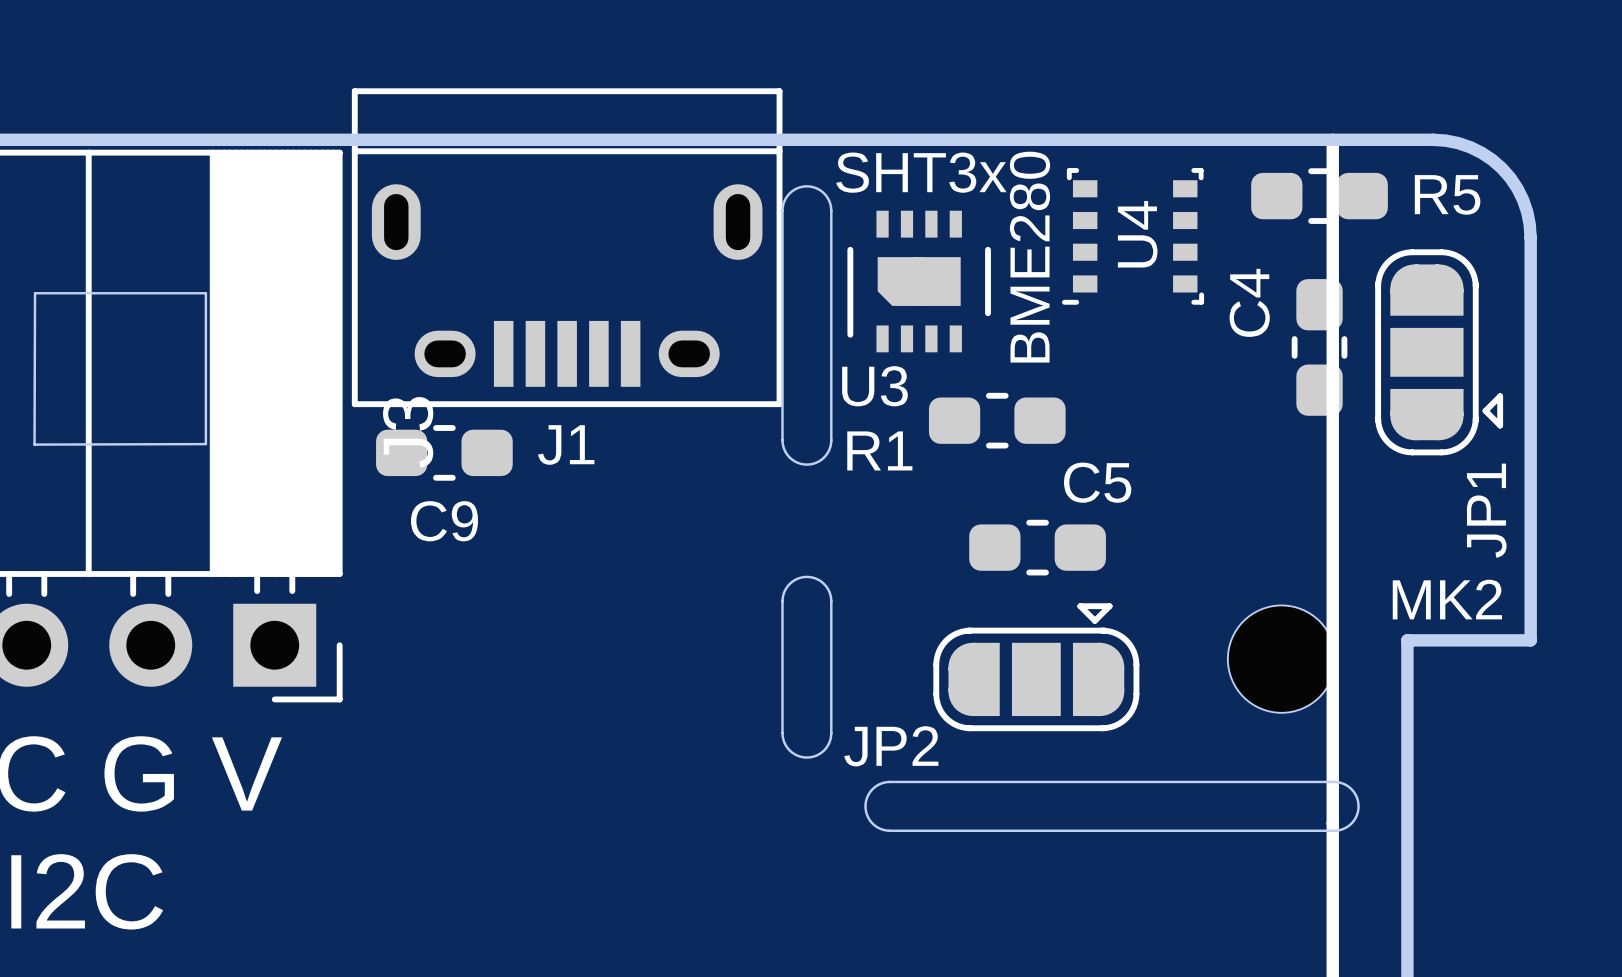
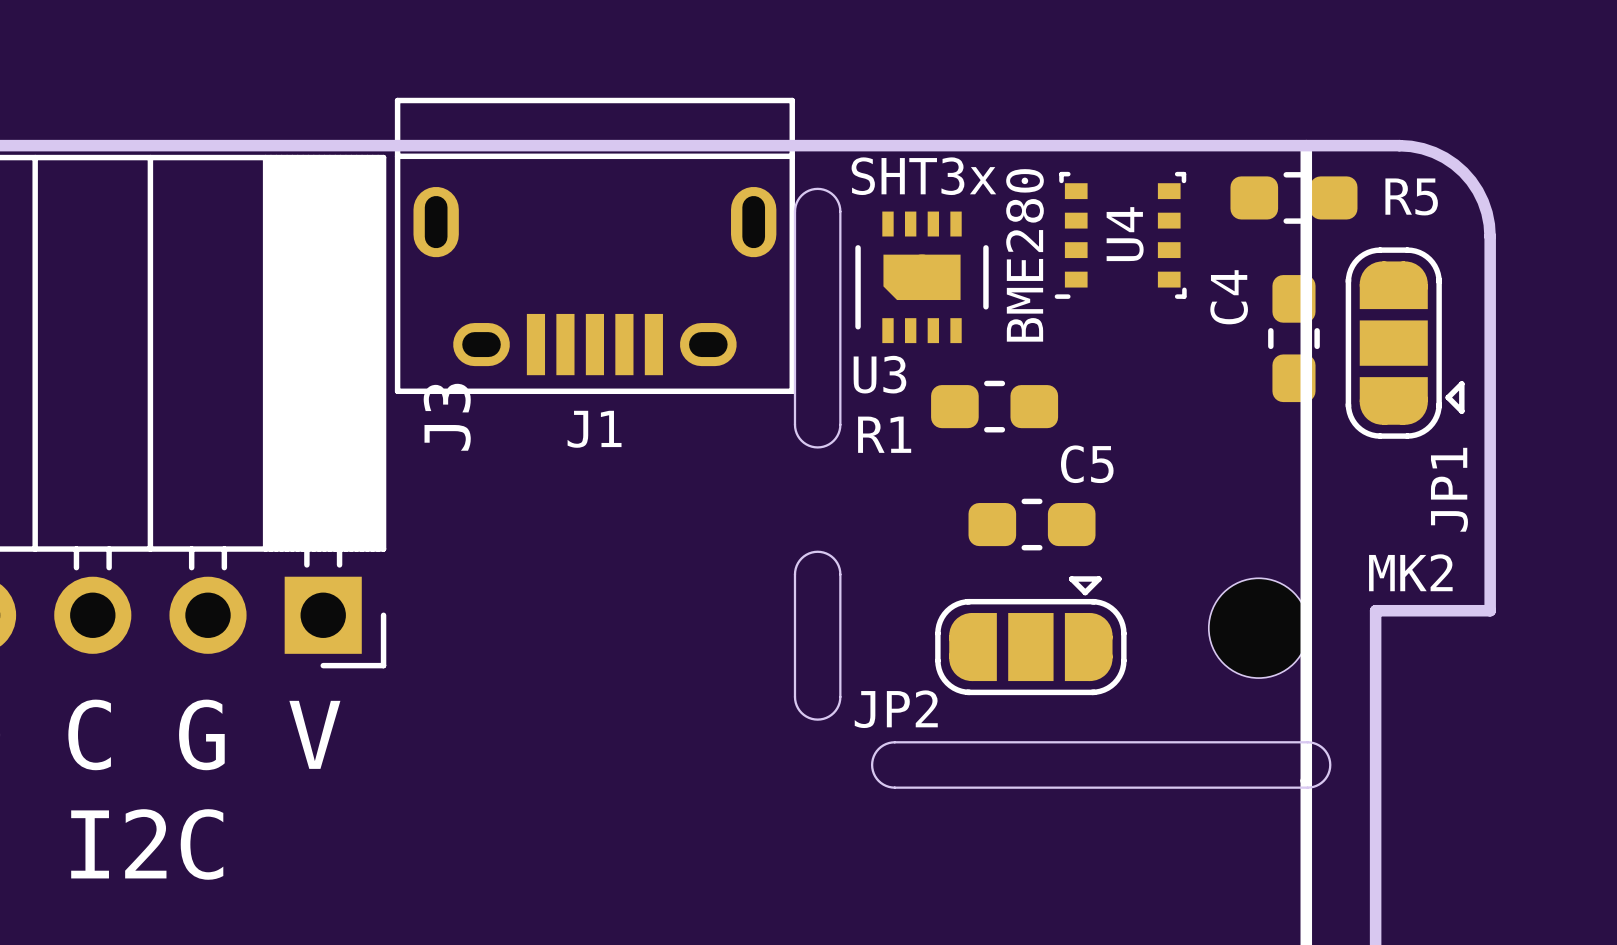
board edge: (35, 293) (205, 293) (205, 444) (34, 444) (35, 293) -> none
C9: (444, 452) -> none

